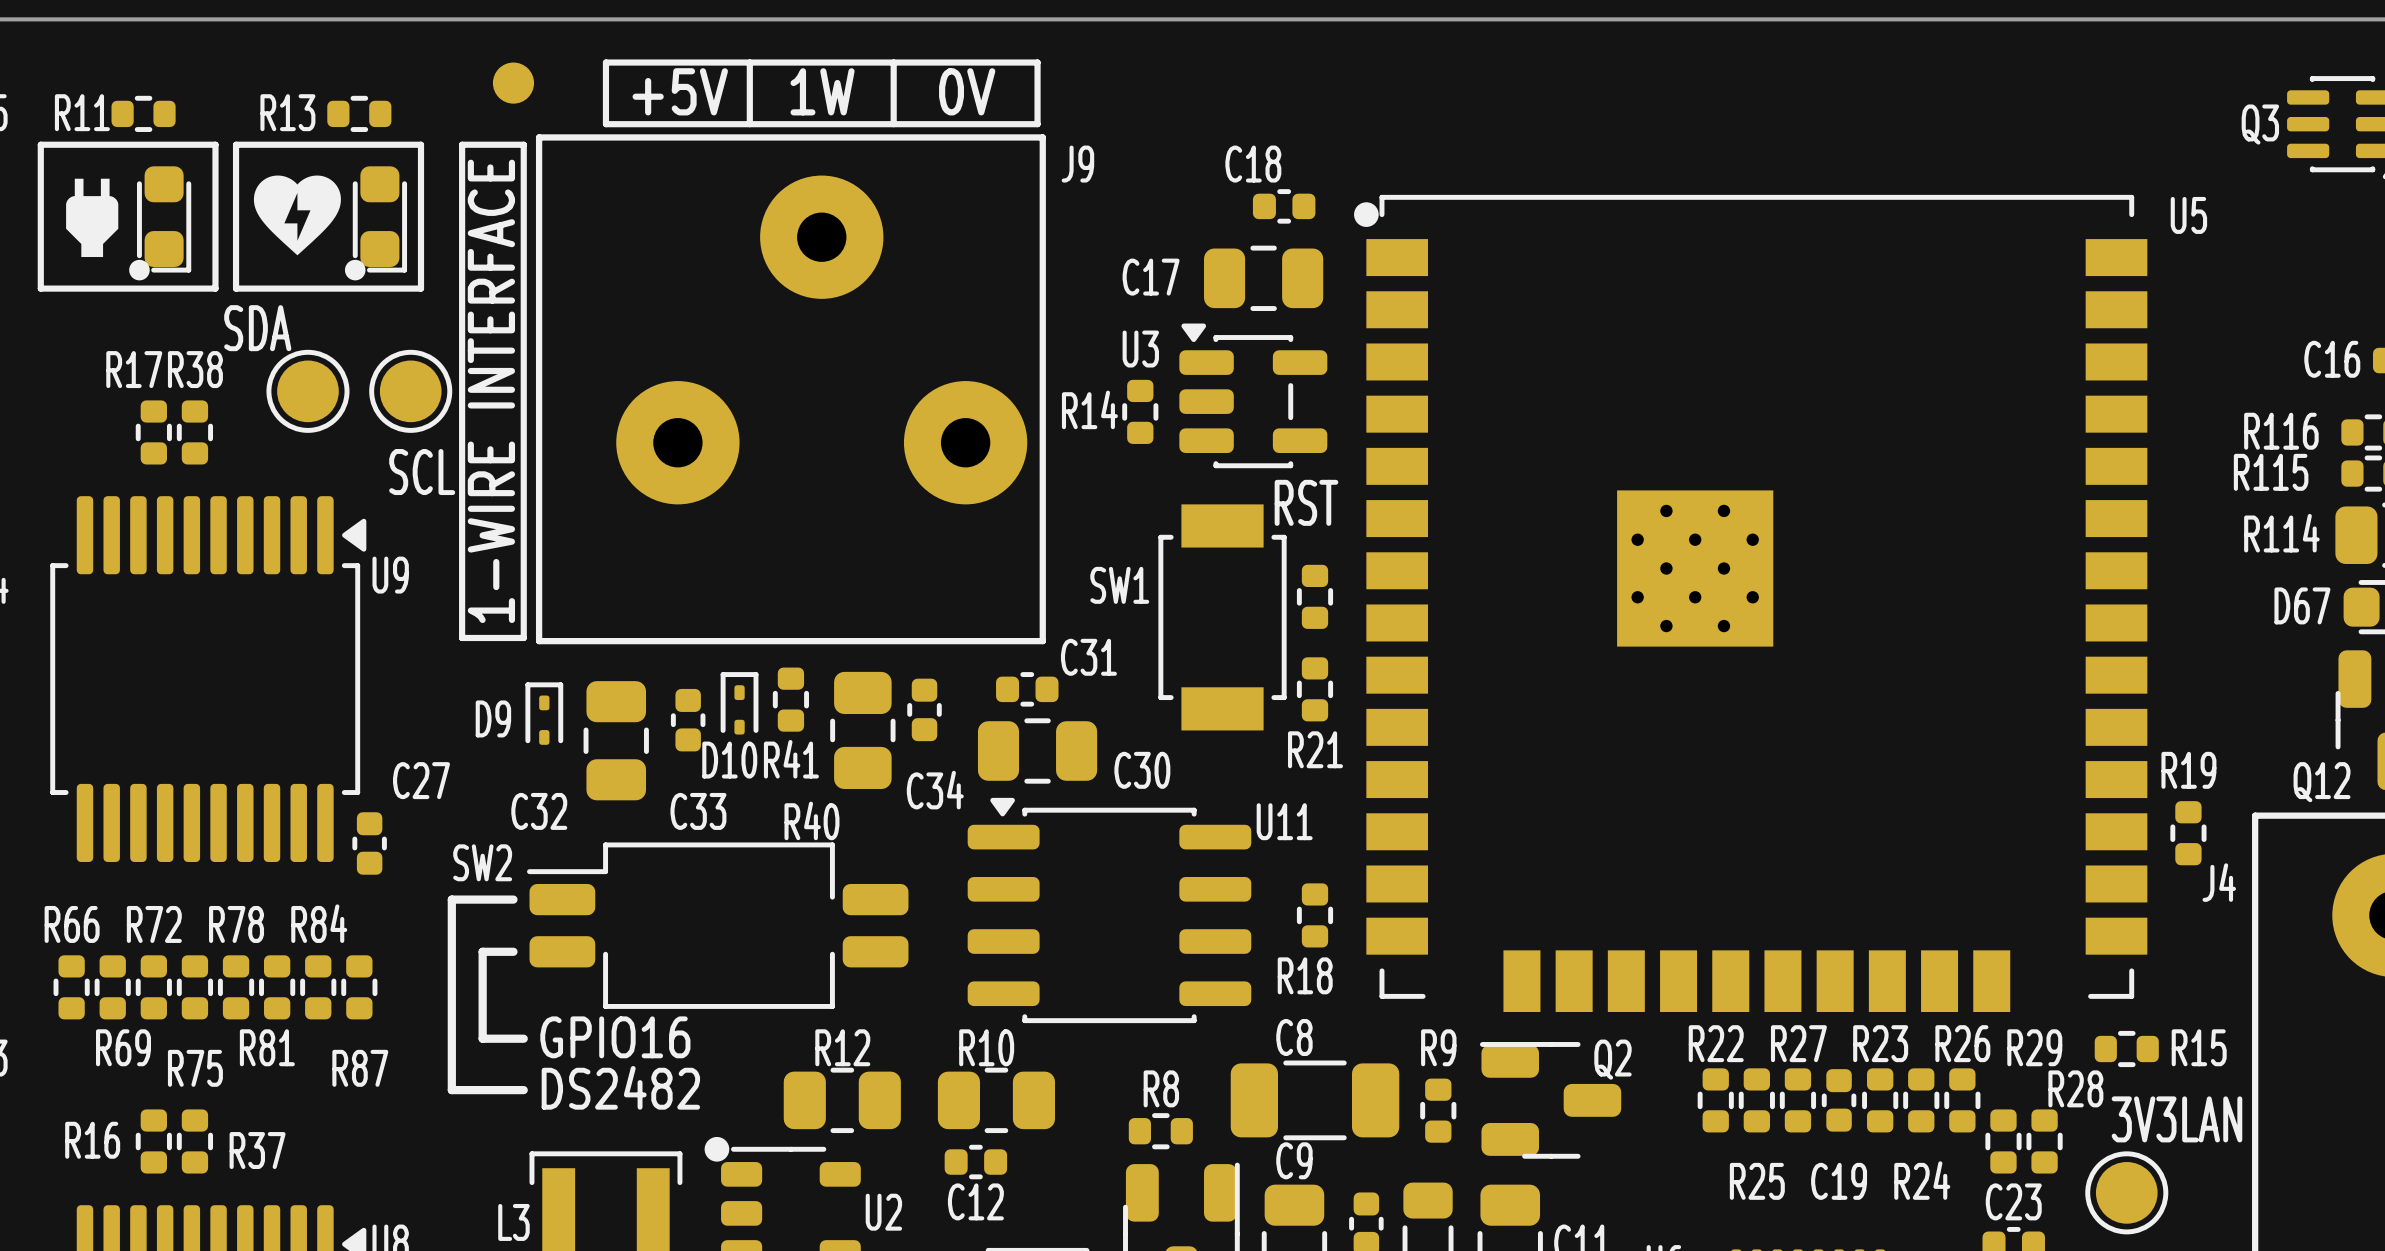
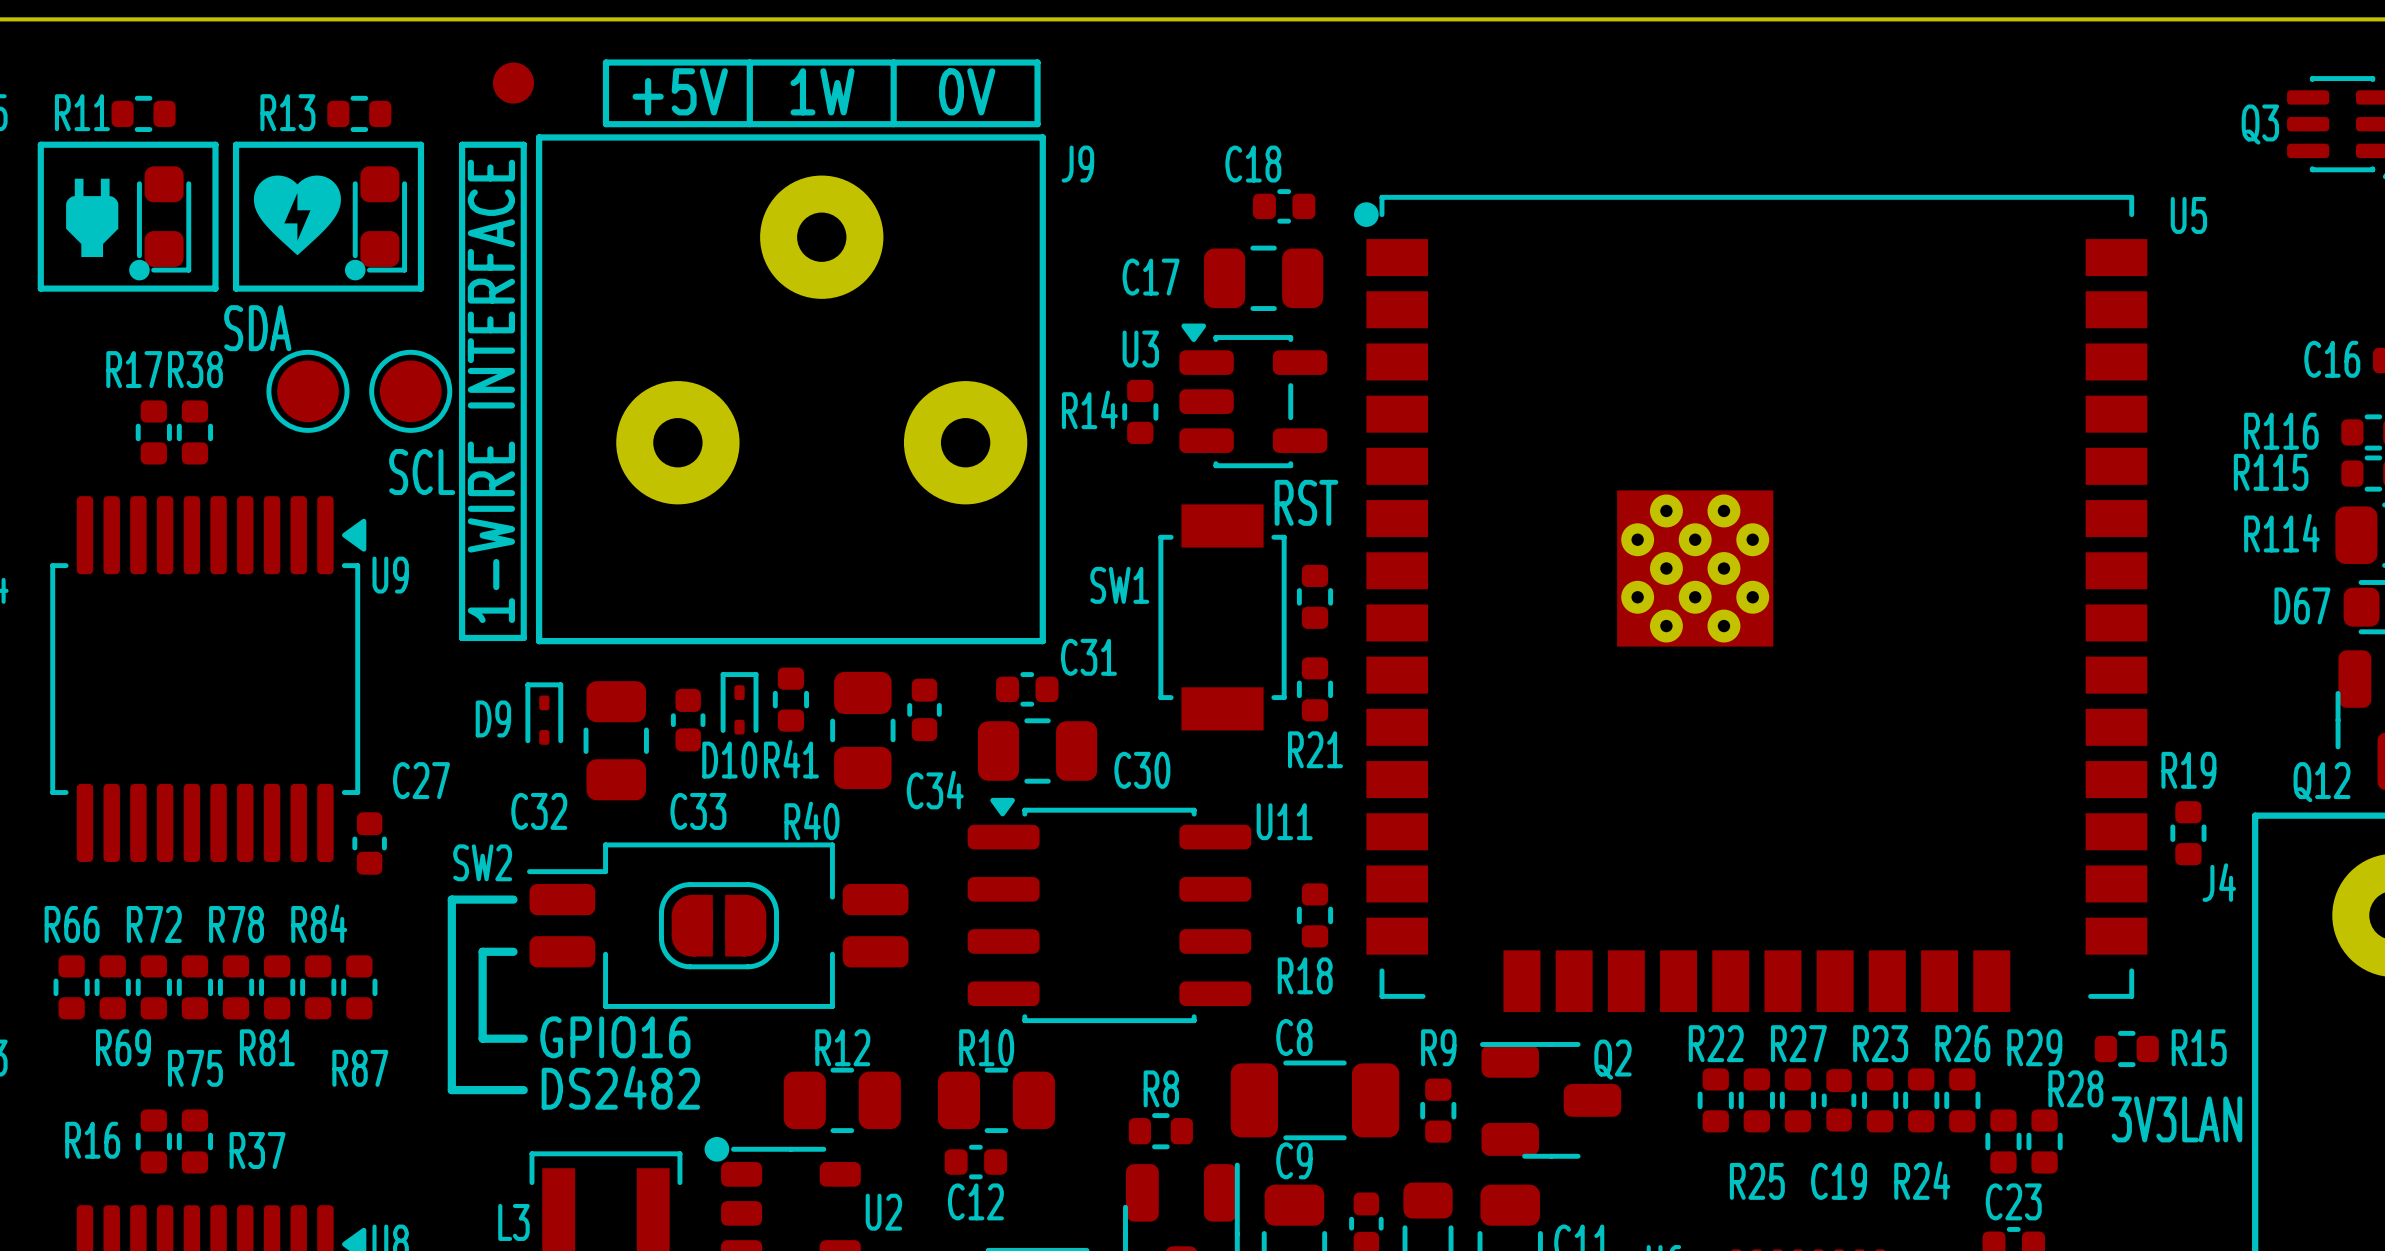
part: none -> (719, 925)
part: (2126, 1192) -> none

